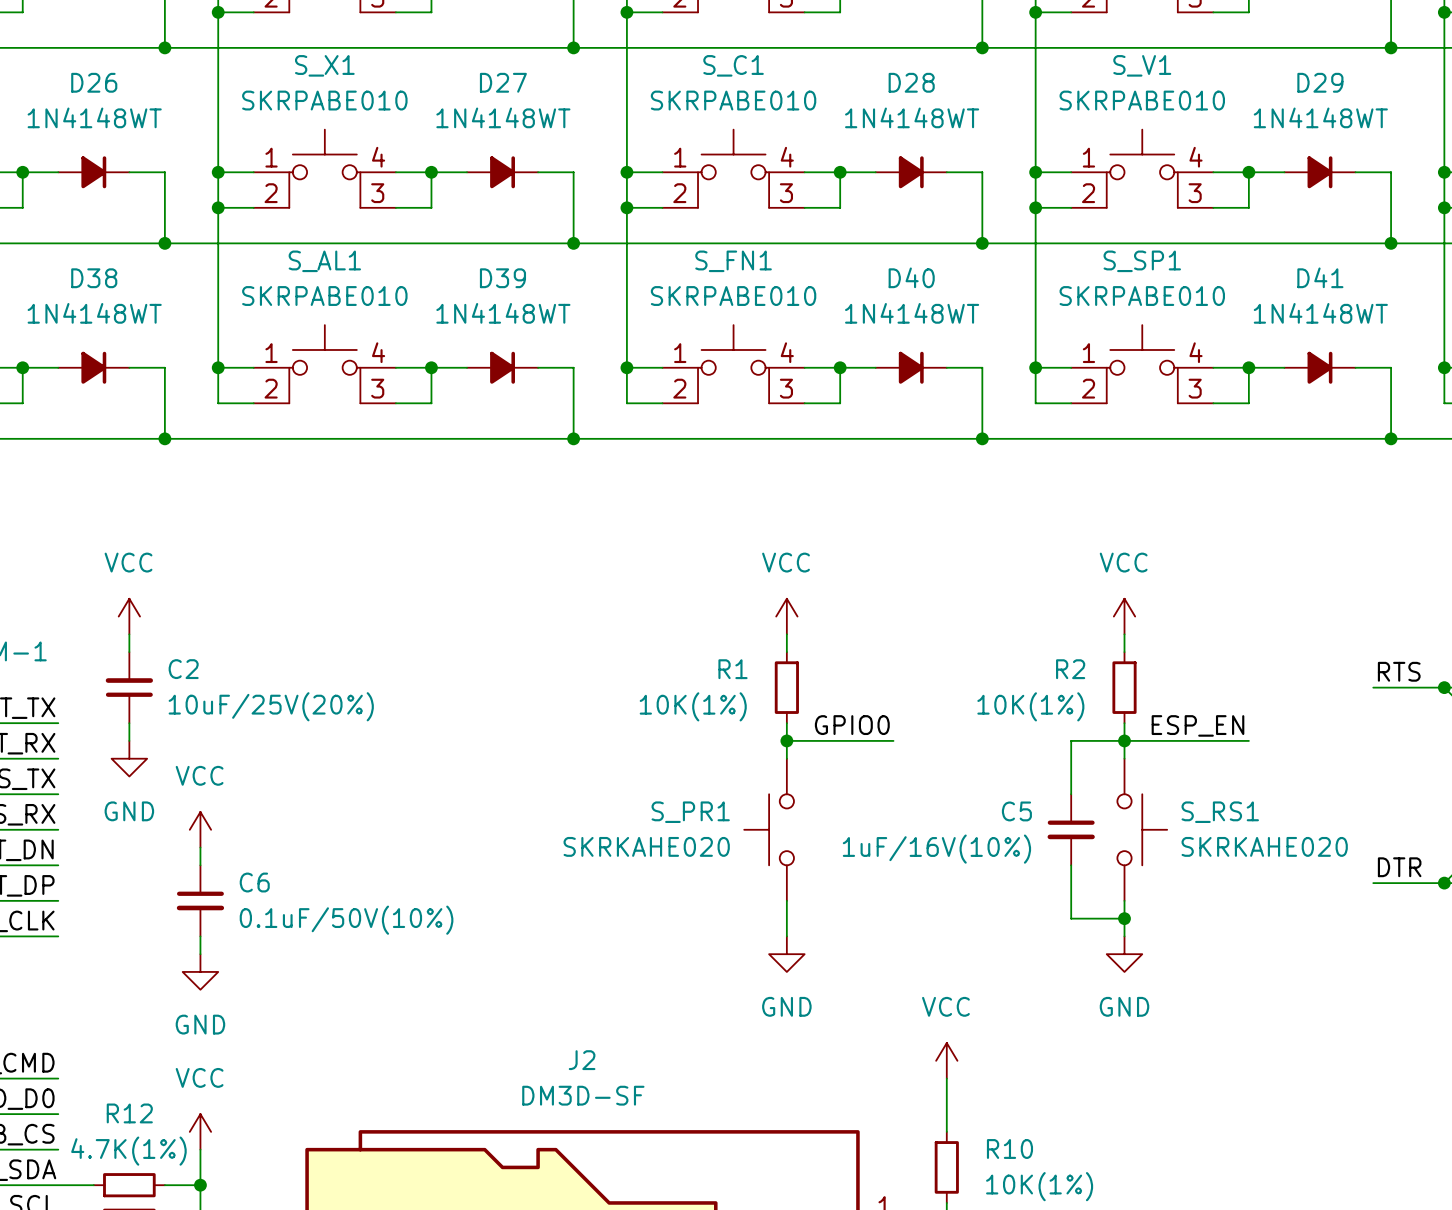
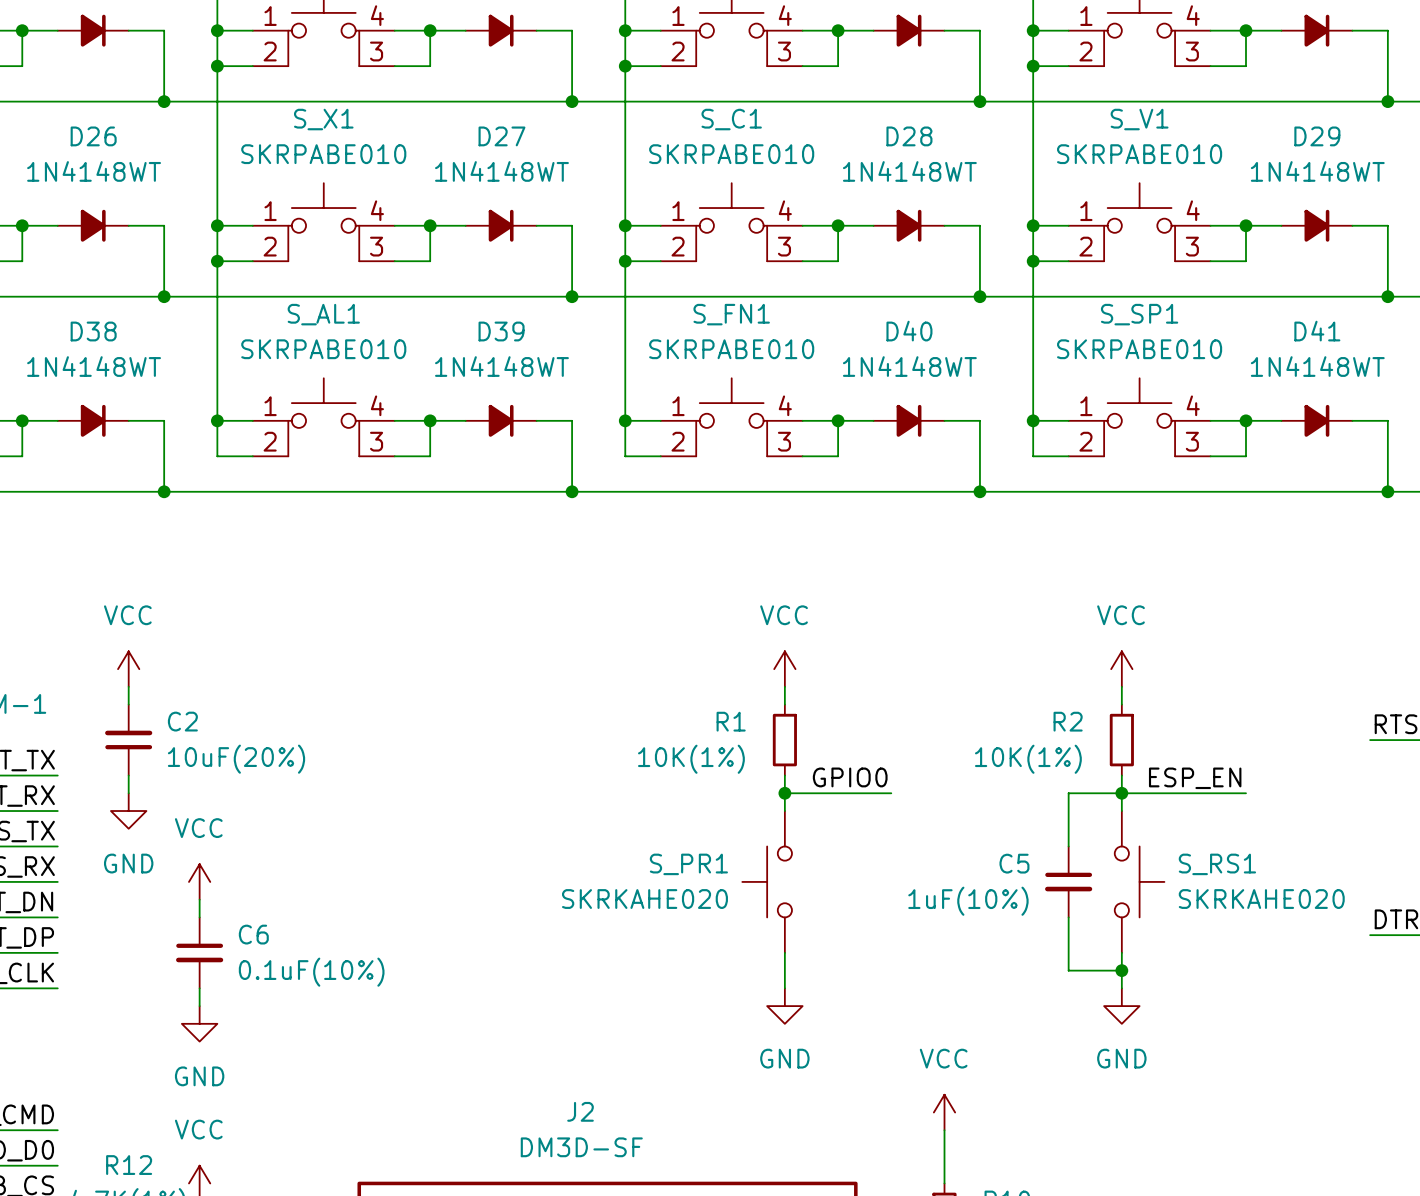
C2 value: 10uF/25V(20%) (271, 706) -> 10uF(20%) (236, 759)
C5 value: 1uF/16V(10%) (936, 849) -> 1uF(10%) (968, 901)
C6 value: 0.1uF/50V(10%) (346, 920) -> 0.1uF(10%) (311, 972)

